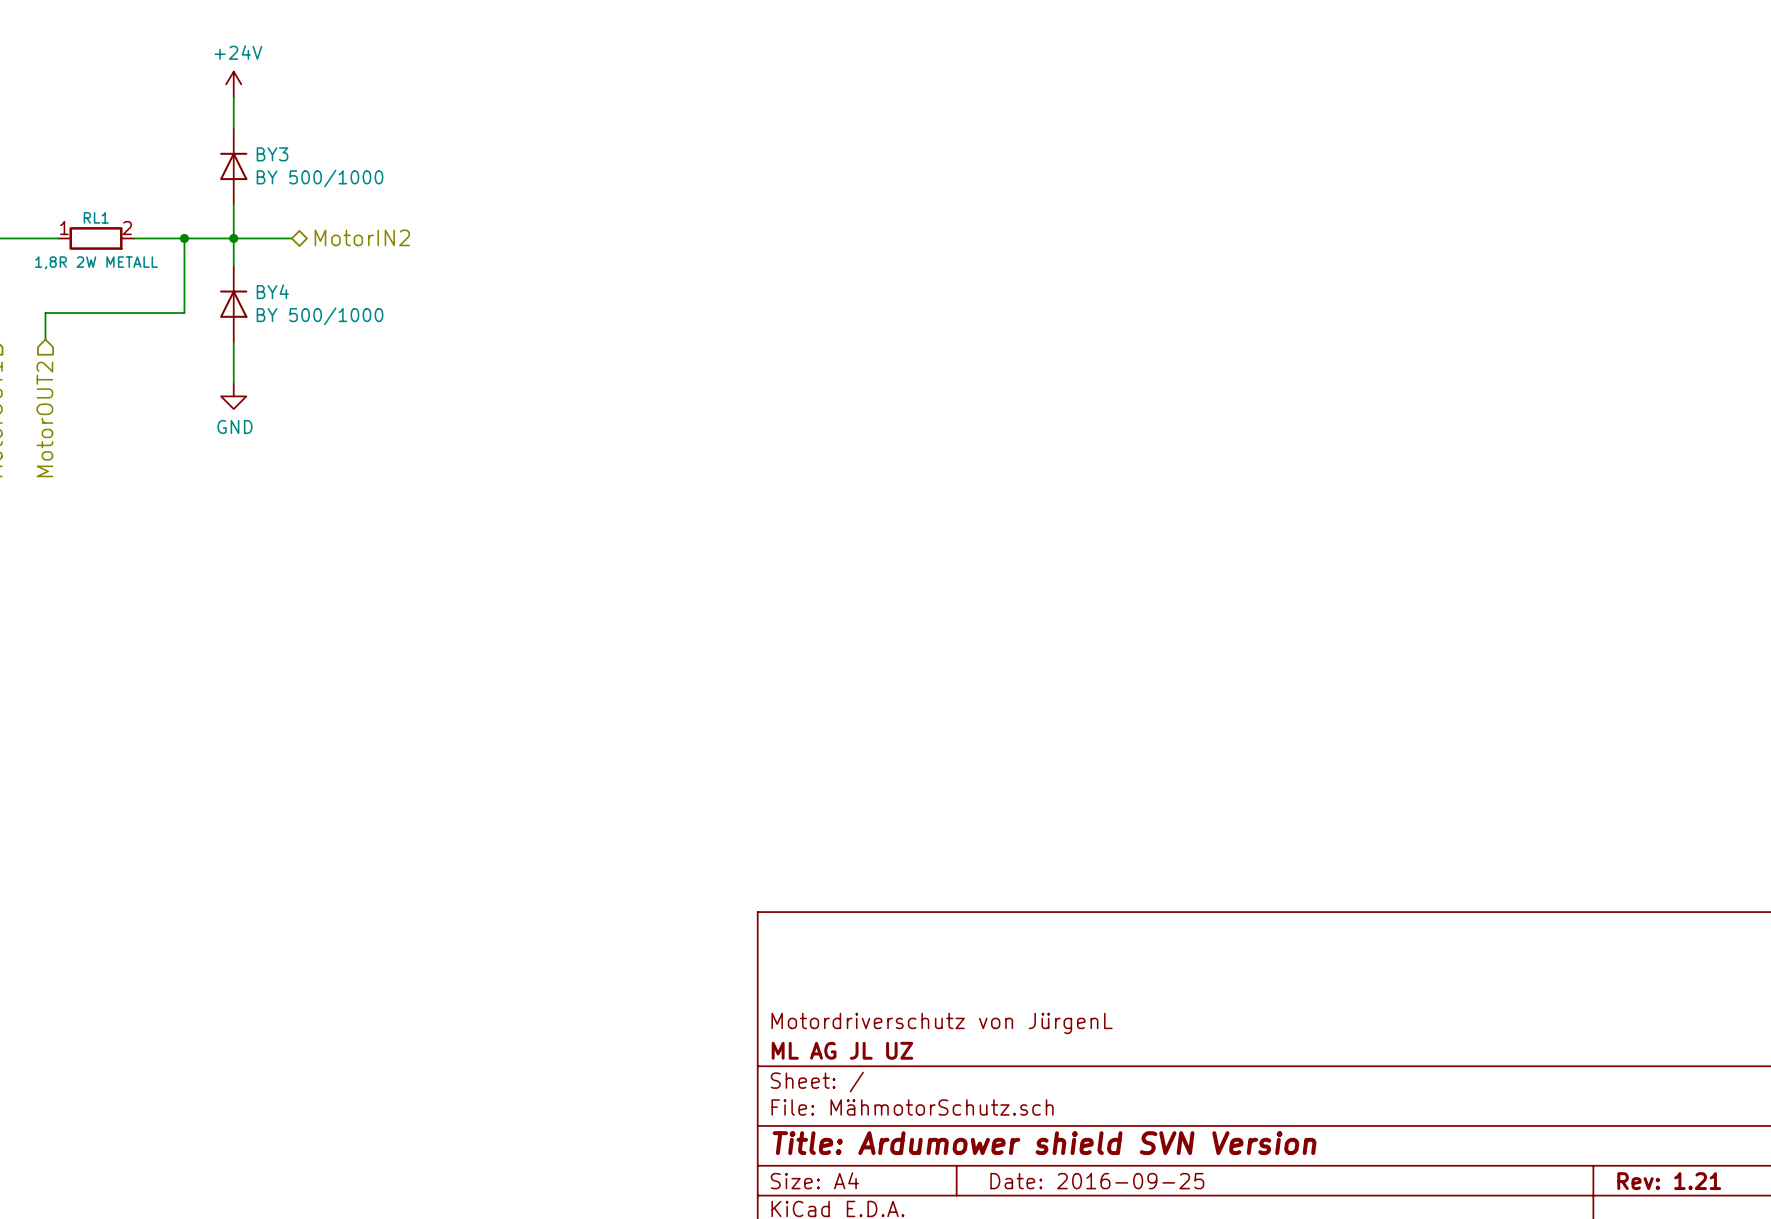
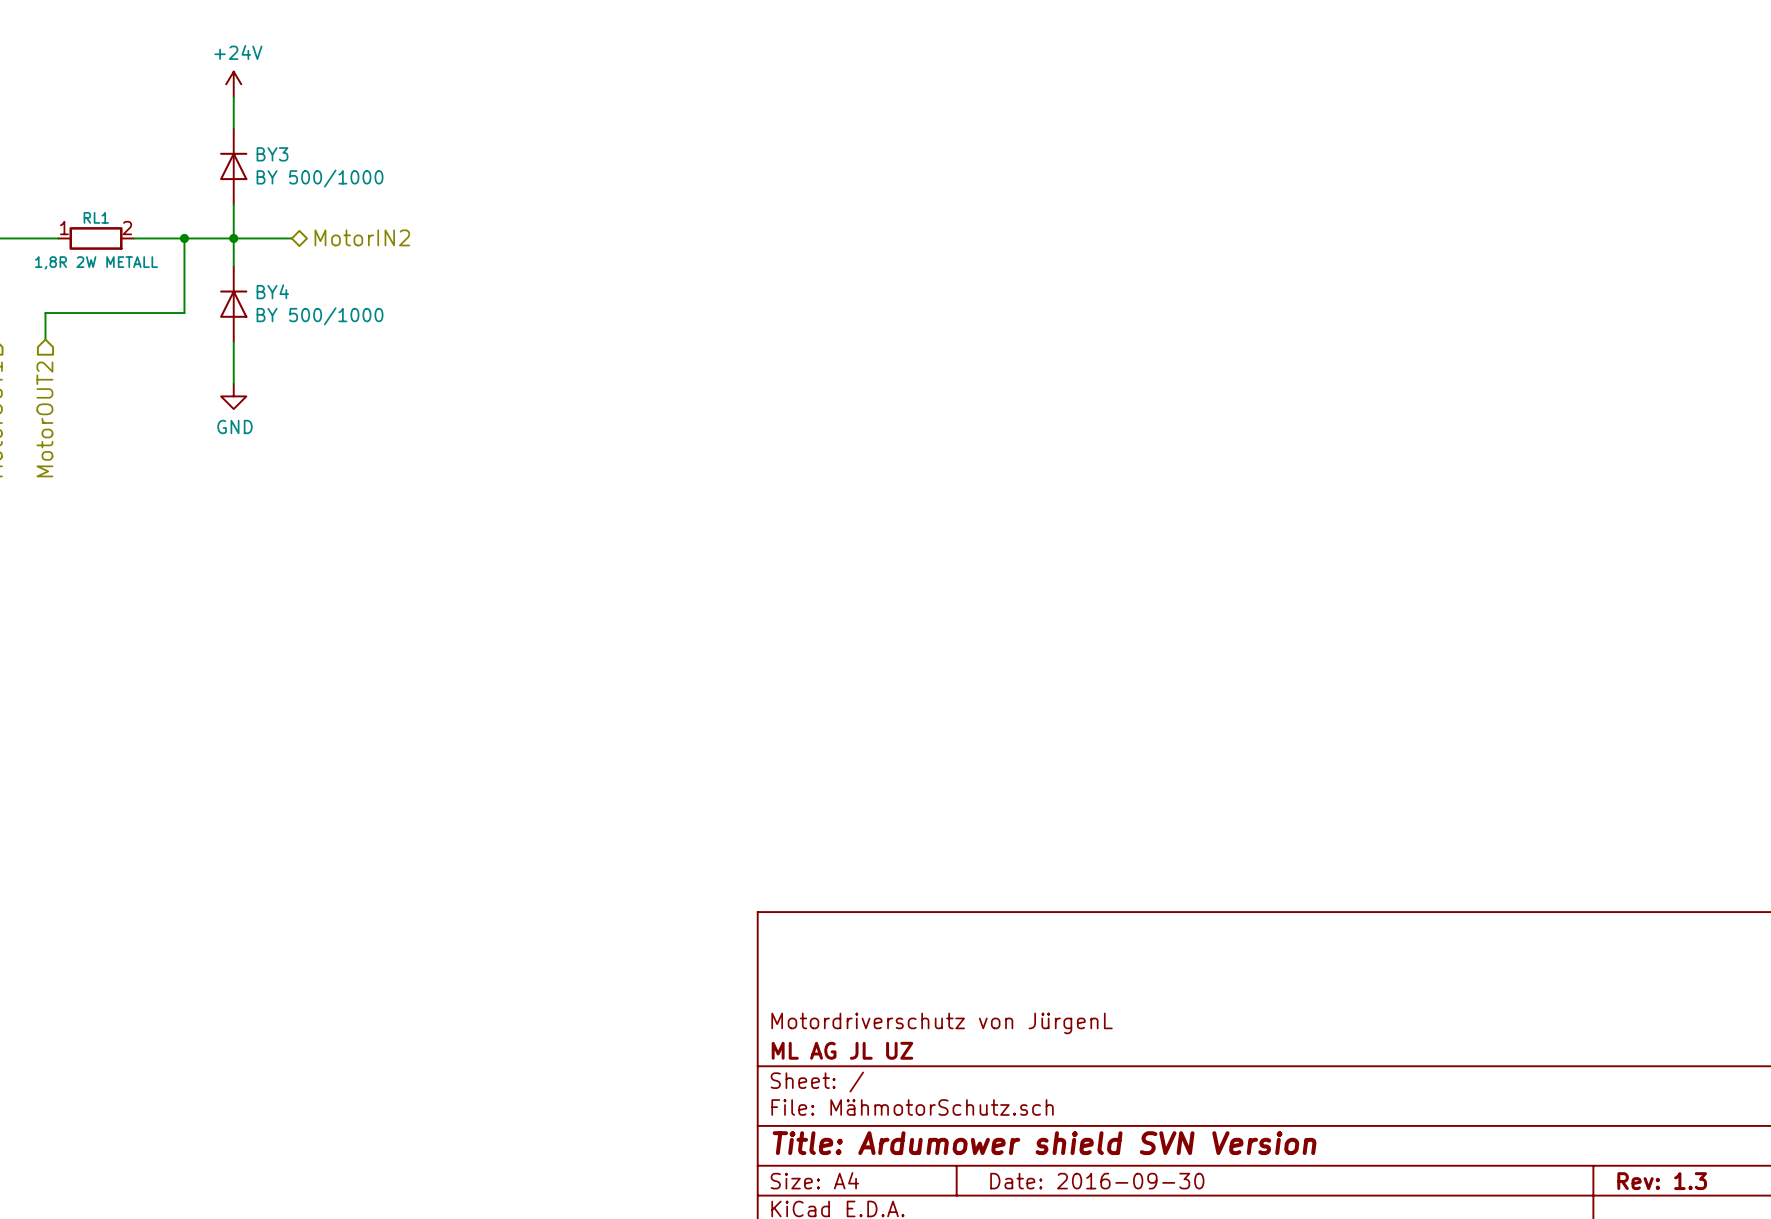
title block: Date: 2016-09-25 (1097, 1181) -> Date: 2016-09-30 (1097, 1181)
title block: Rev: 1.21 (1669, 1181) -> Rev: 1.3 (1662, 1181)

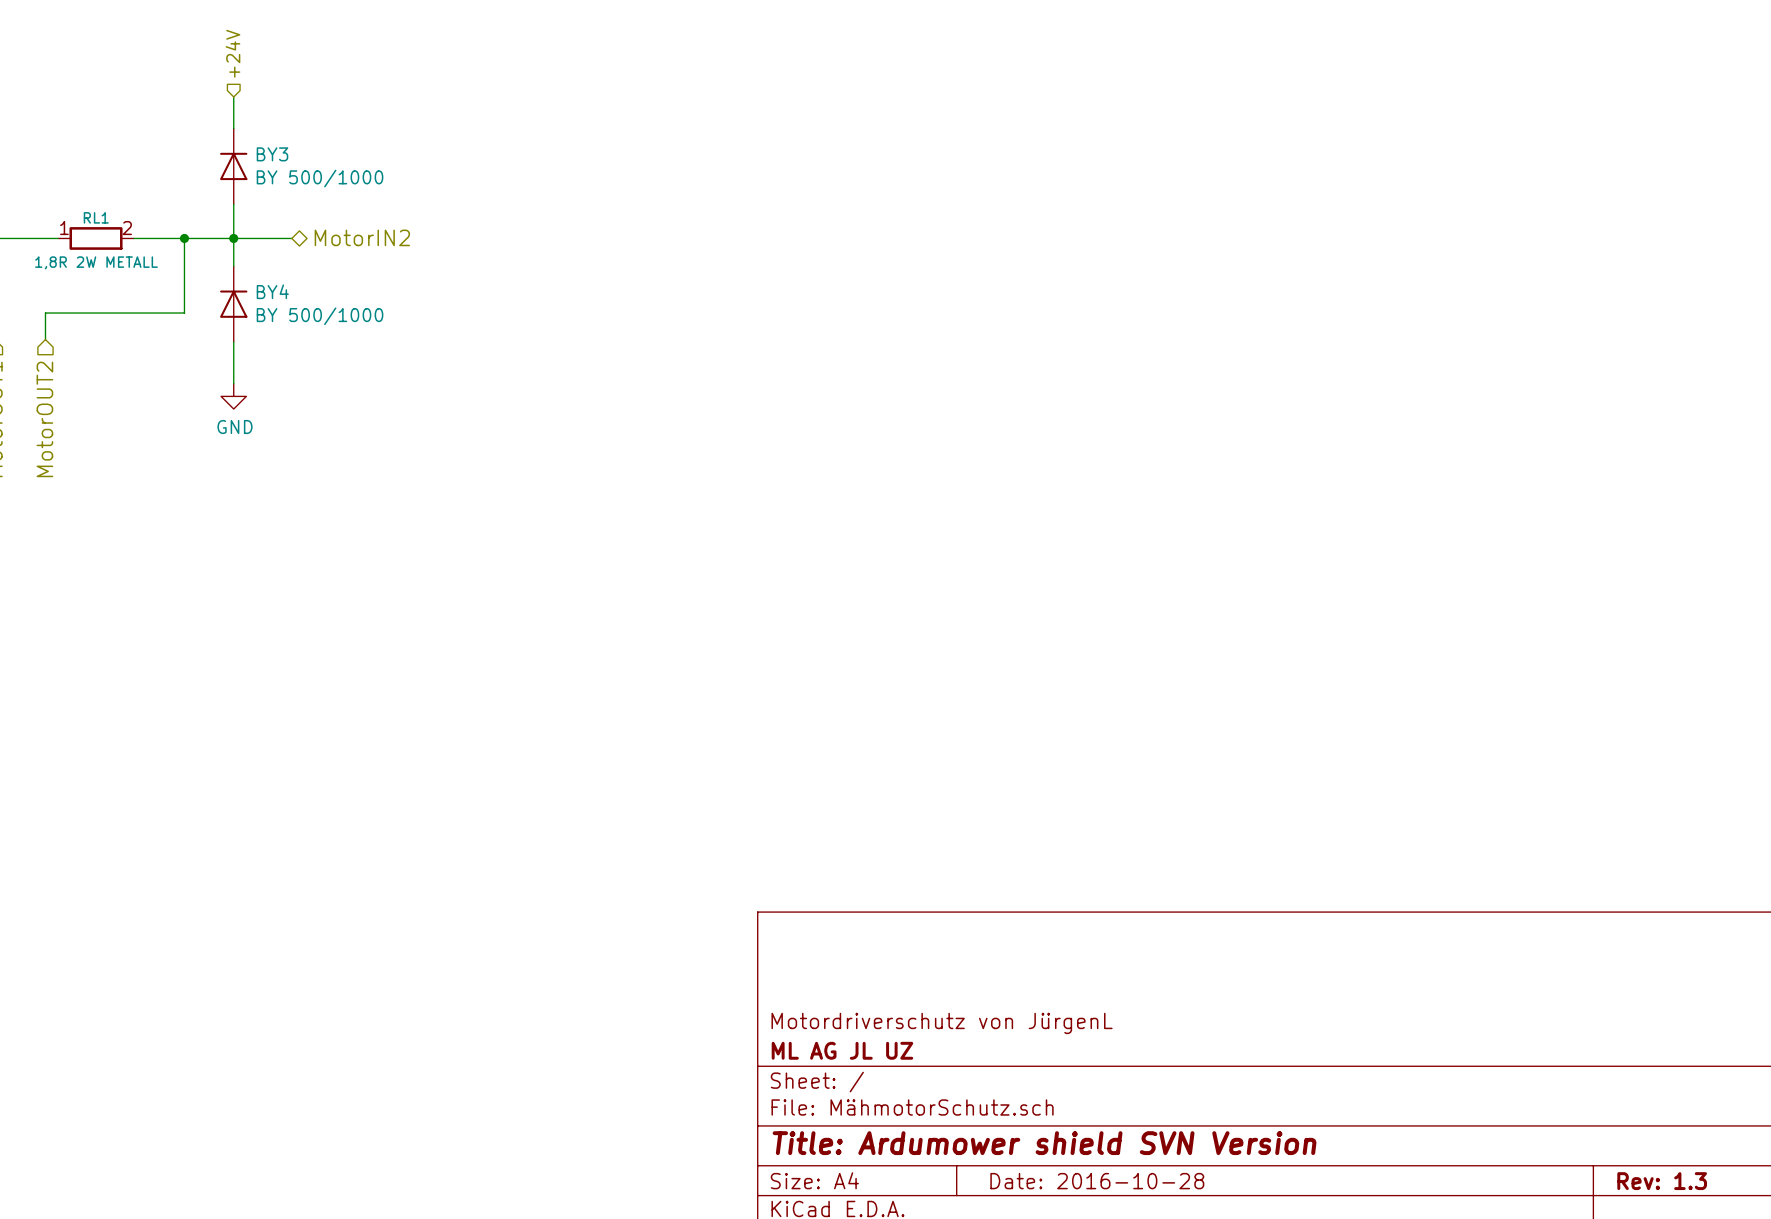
hierarchical label: none -> +24V (232, 53)
power symbol: +24V (233, 84) -> none
title block: Date: 2016-09-30 (1097, 1181) -> Date: 2016-10-28 (1097, 1181)

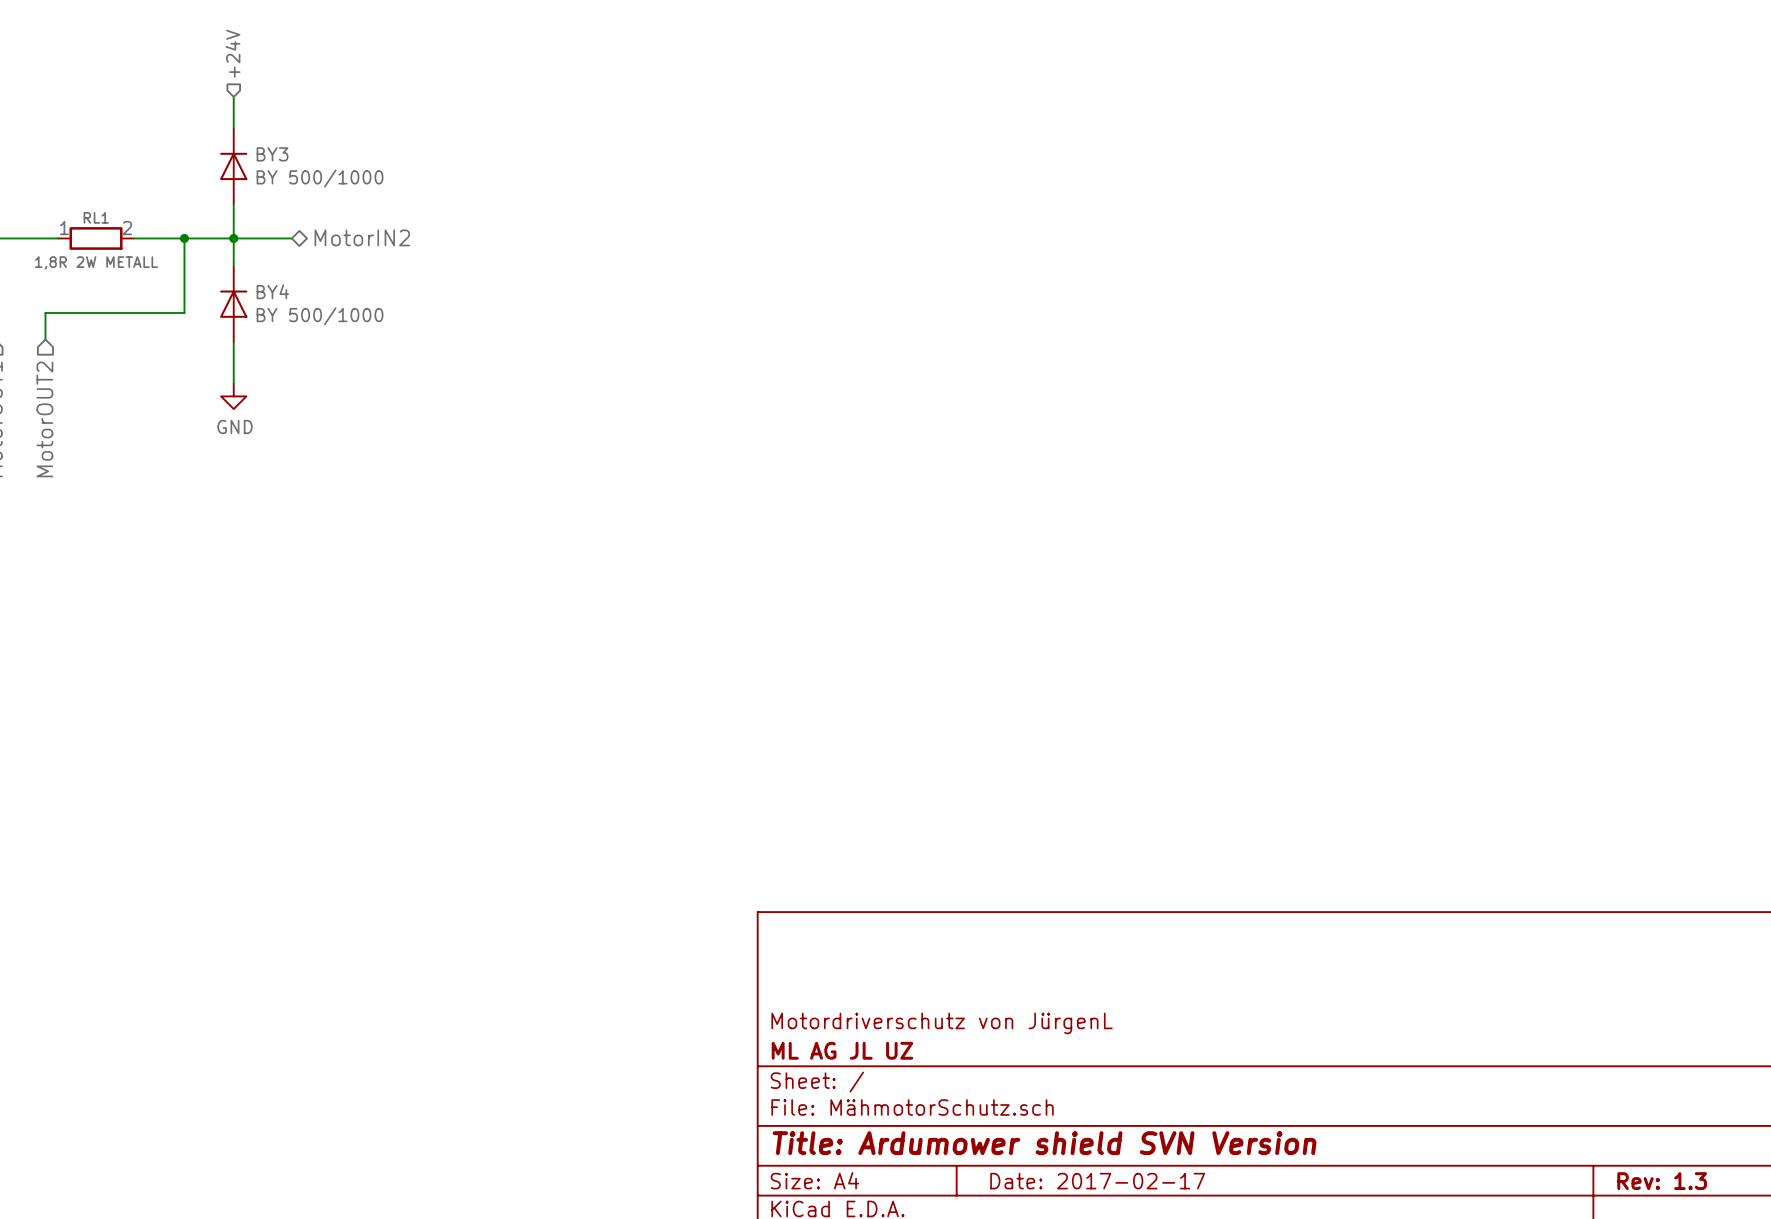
title block: Date: 2016-10-28 (1097, 1181) -> Date: 2017-02-17 (1097, 1181)

